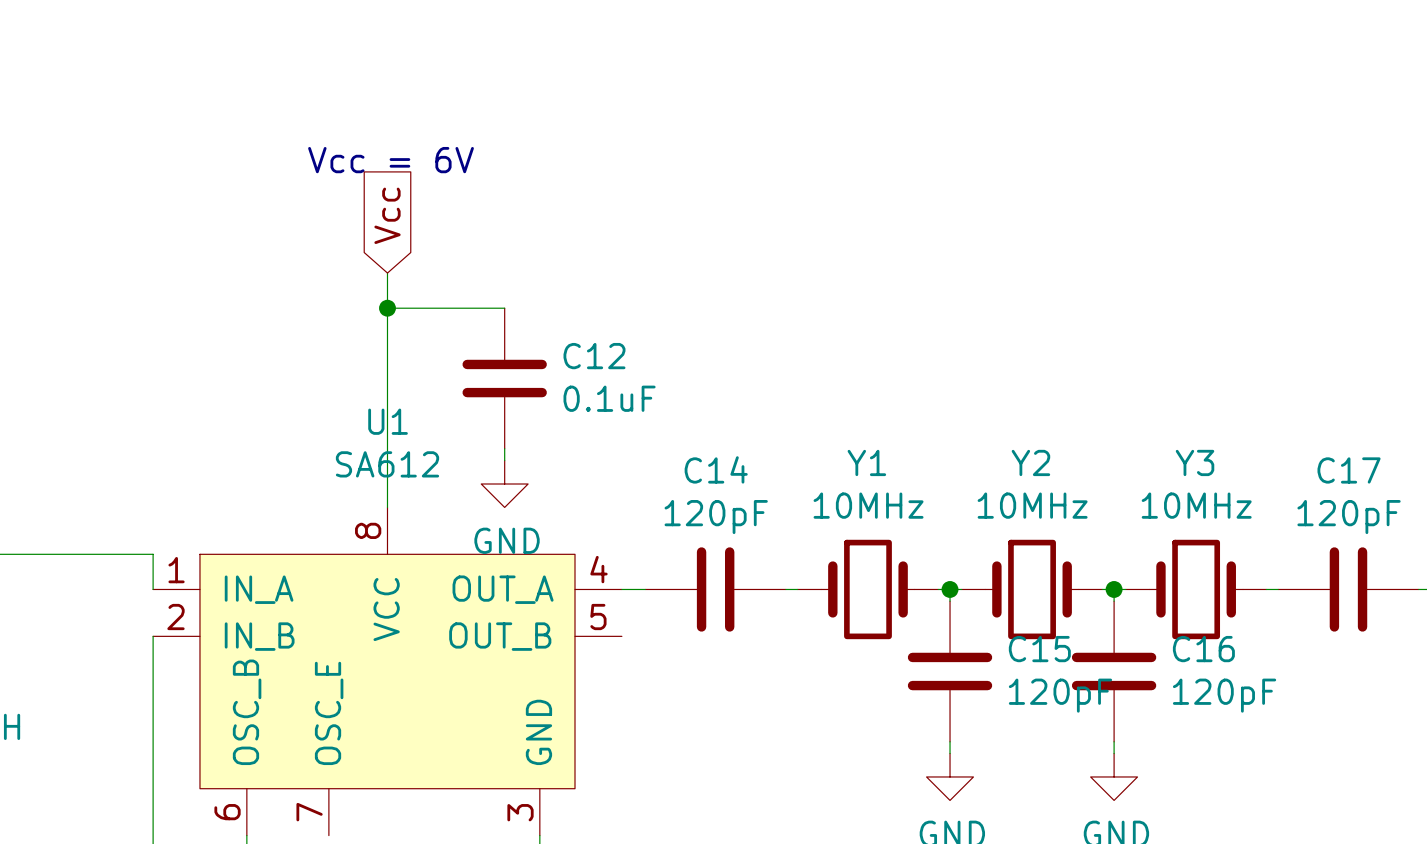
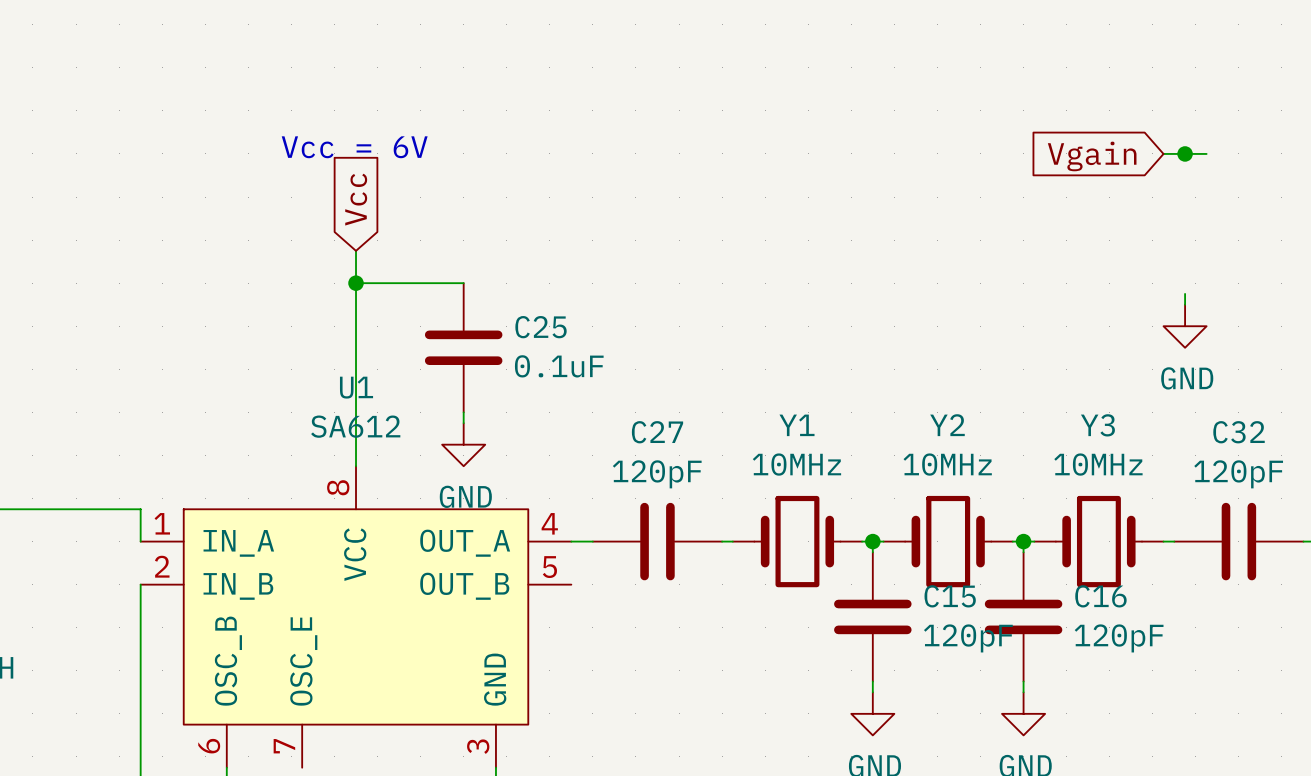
wire: none -> (1163, 153) (1206, 153)
junction: none -> (1185, 153)
global label: none -> Vgain (1092, 156)
wire: none -> (1185, 293) (1185, 304)
power symbol: none -> GND (1185, 326)
C12 name: C12 (594, 356) -> C25 (541, 327)
C14 name: C14 (716, 469) -> C27 (657, 432)
C17 name: C17 (1349, 470) -> C32 (1239, 432)

